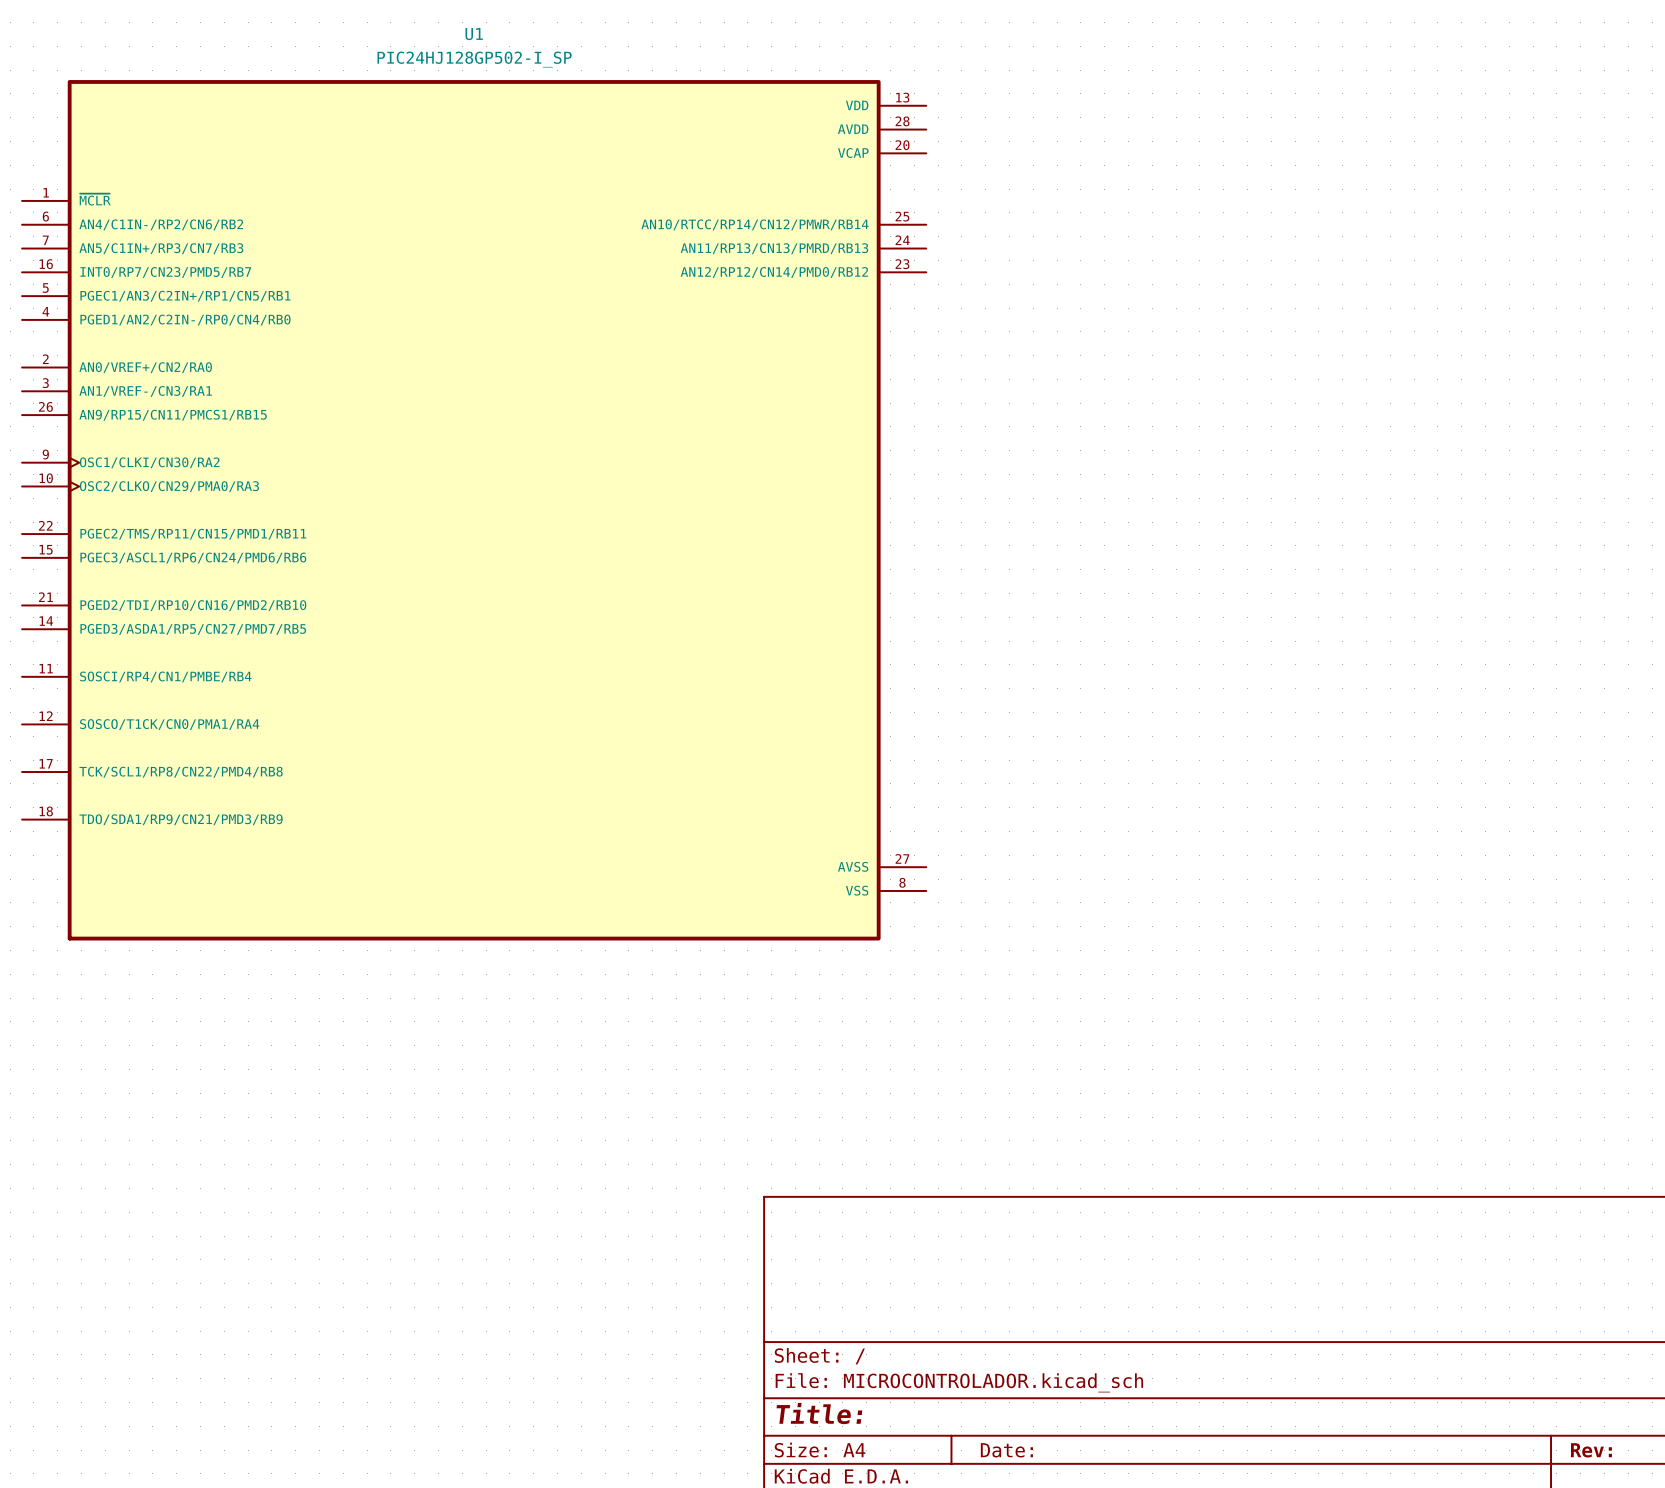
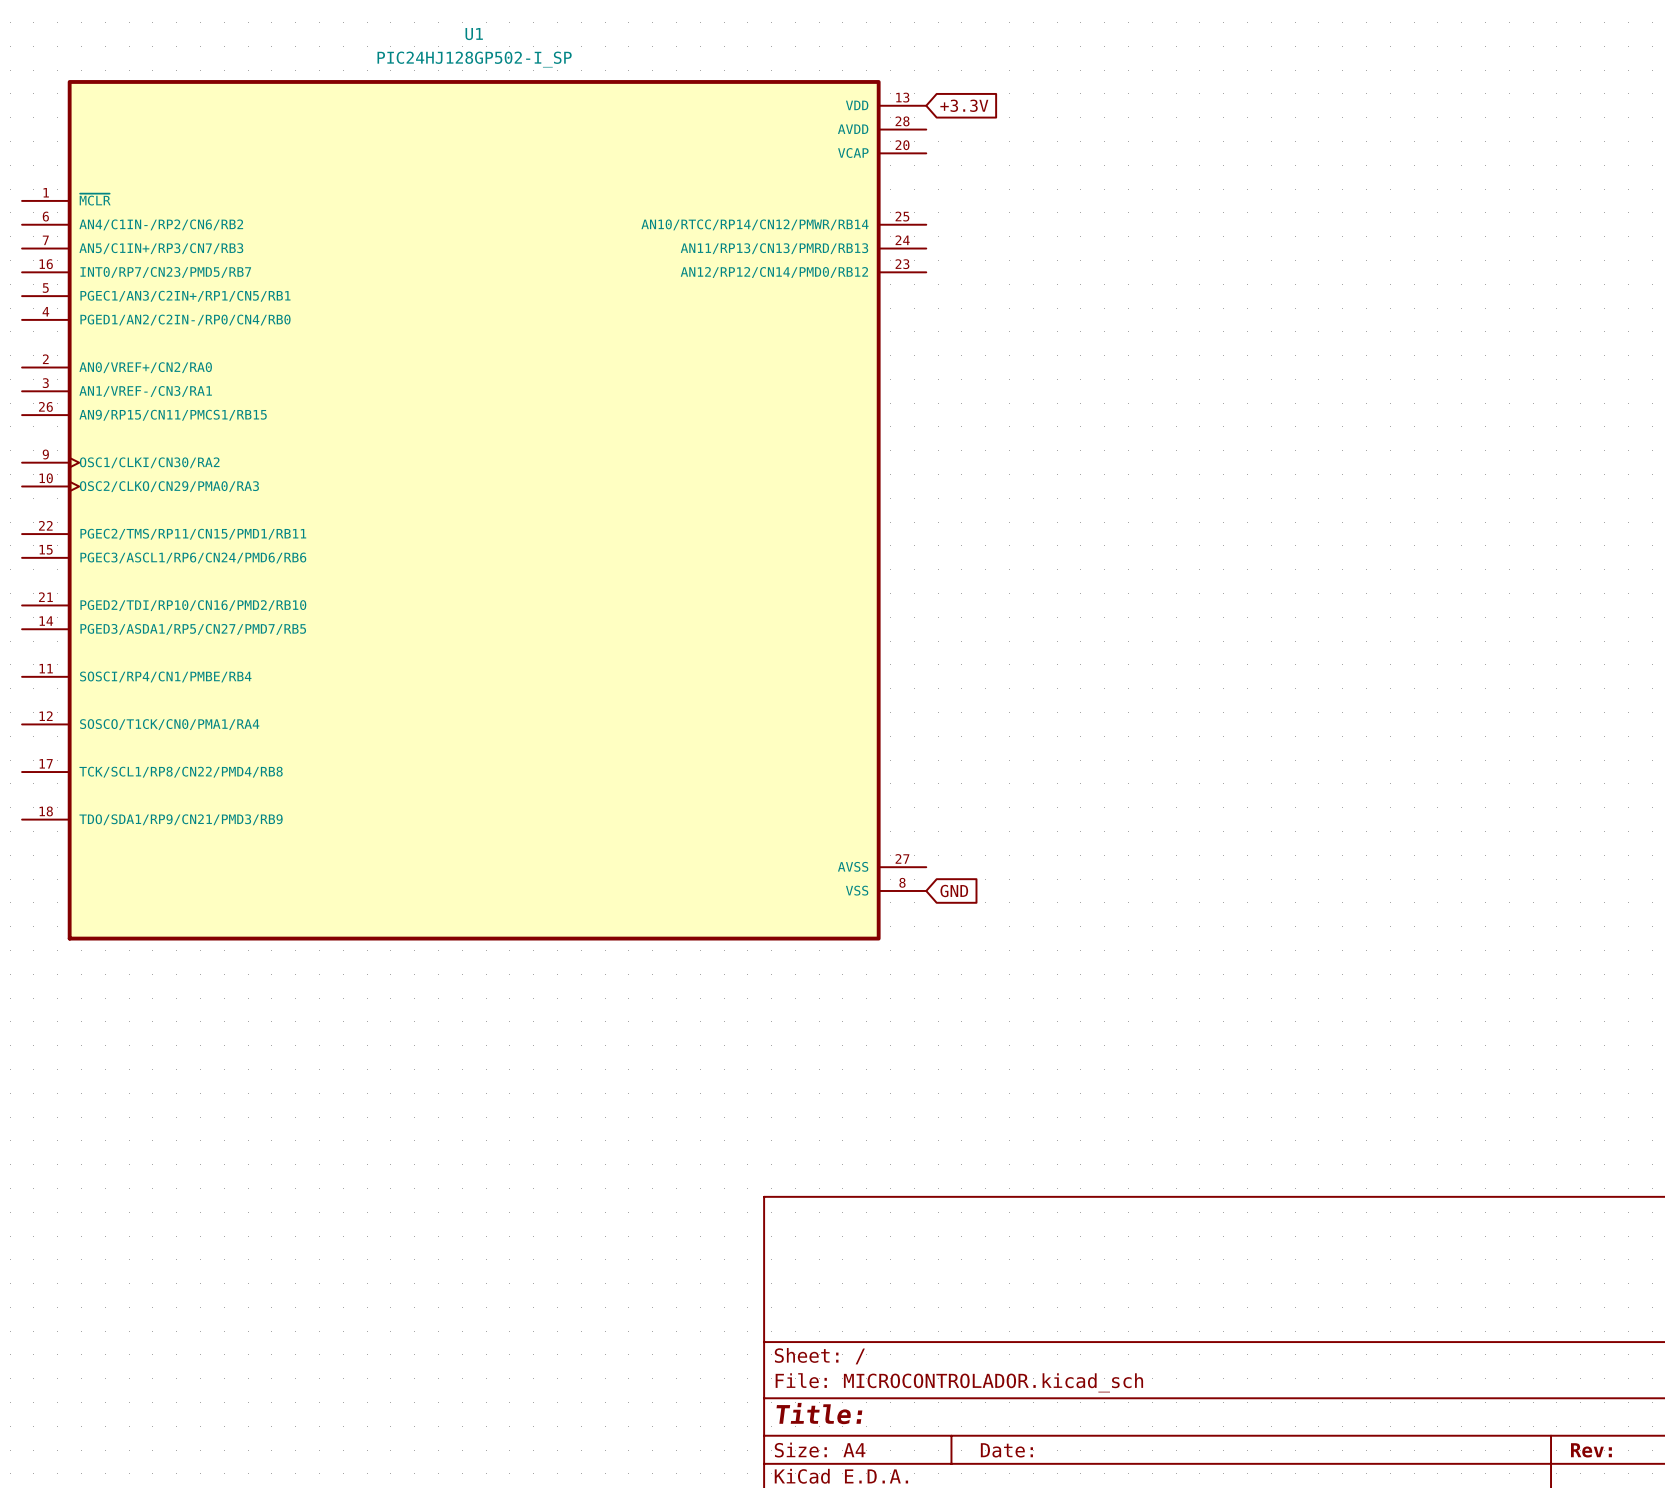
global label: none -> +3.3V (964, 105)
global label: none -> GND (954, 891)

